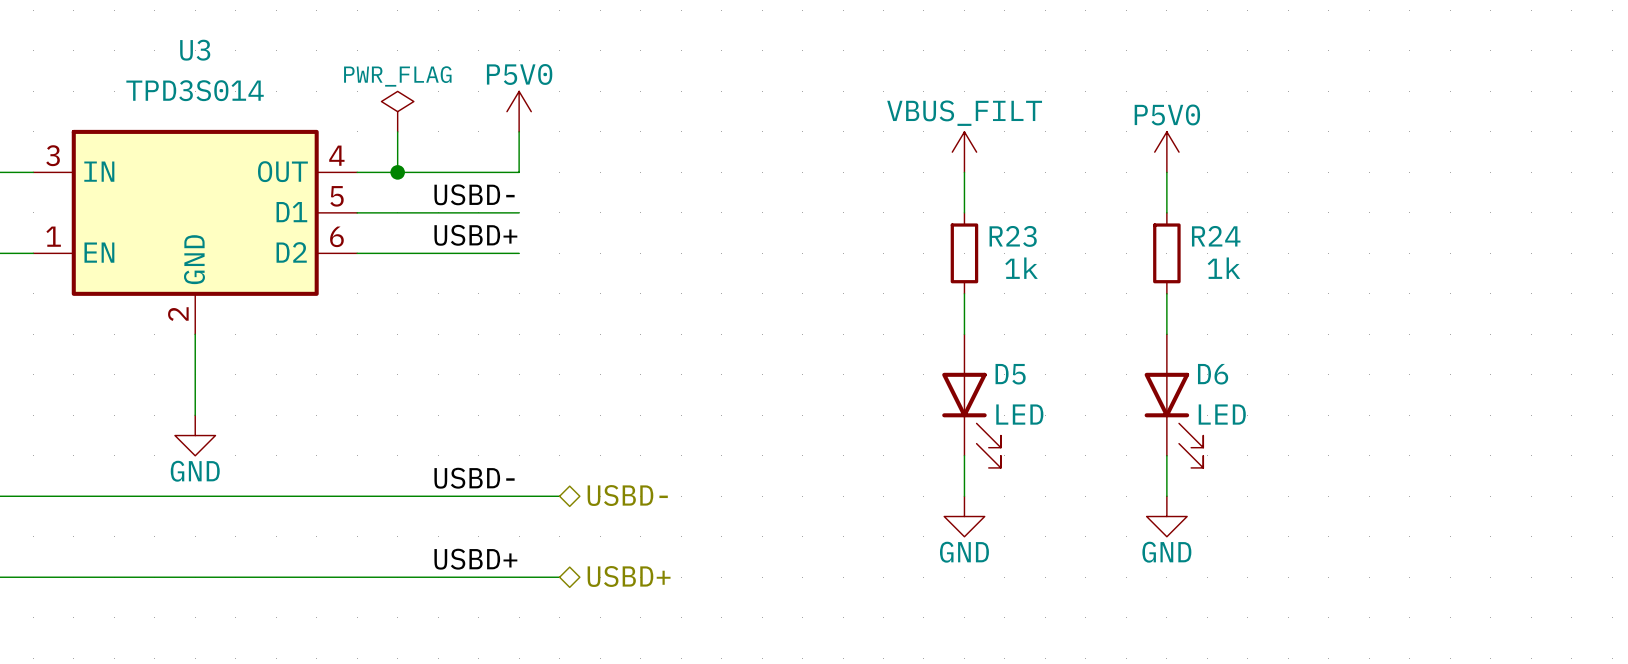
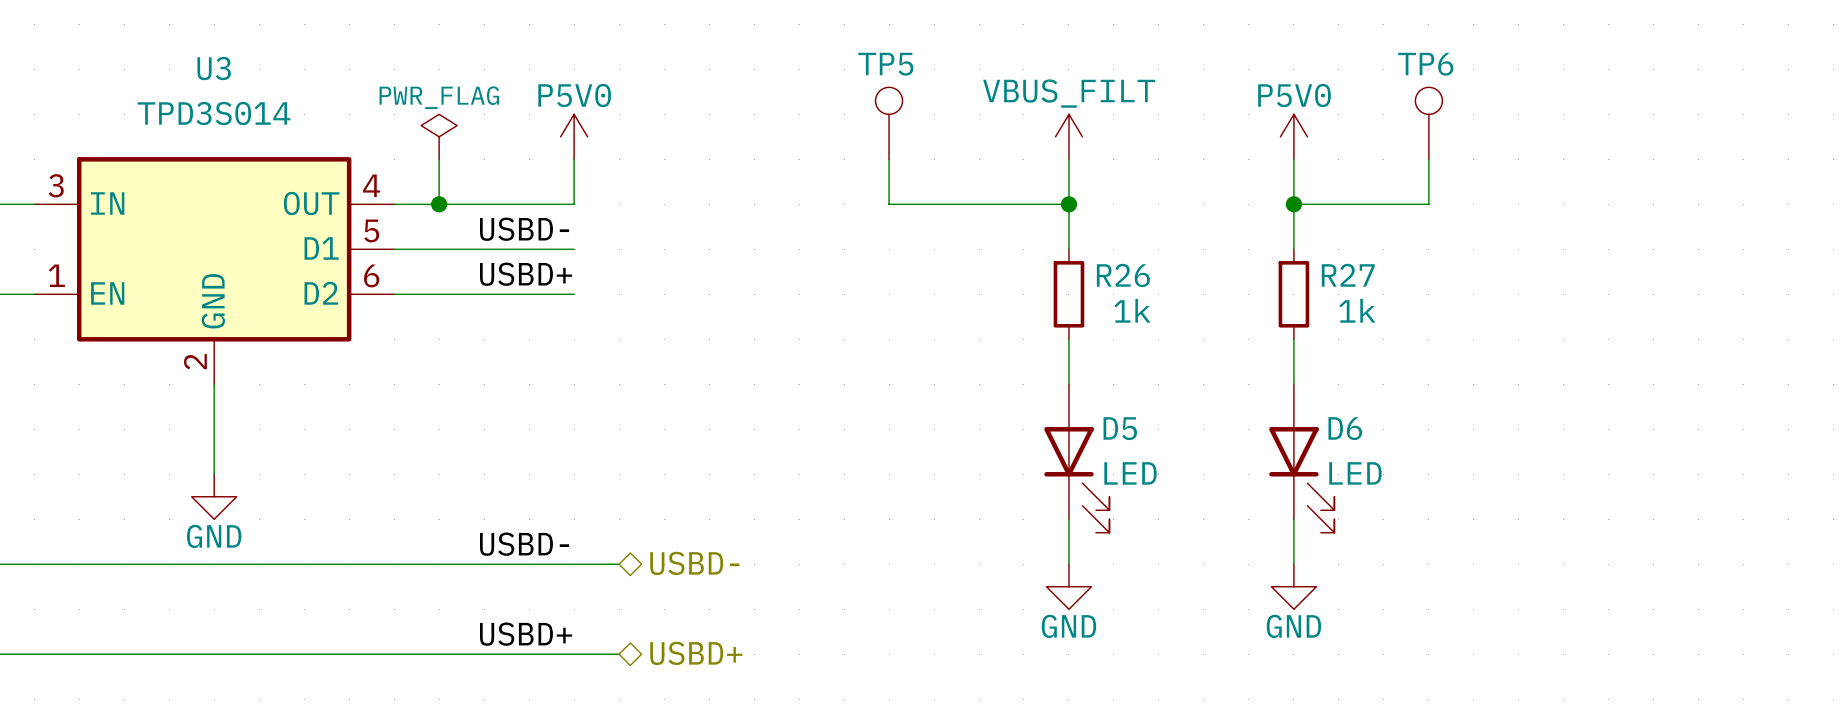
TP5: none -> (889, 123)
TP6: none -> (1428, 123)
wire: none -> (889, 159) (889, 204) (1068, 204) (1068, 159)
wire: none -> (1293, 159) (1293, 204) (1428, 204) (1428, 159)
power symbol position: VBUS_FILT (964, 152) -> VBUS_FILT (1068, 136)
power symbol position: P5V0 (1166, 152) -> P5V0 (1293, 136)
junction: none -> (1068, 204)
junction: none -> (1293, 204)
R23 name: R23 (1013, 236) -> R26 (1123, 275)
R24 name: R24 (1216, 236) -> R27 (1348, 275)

